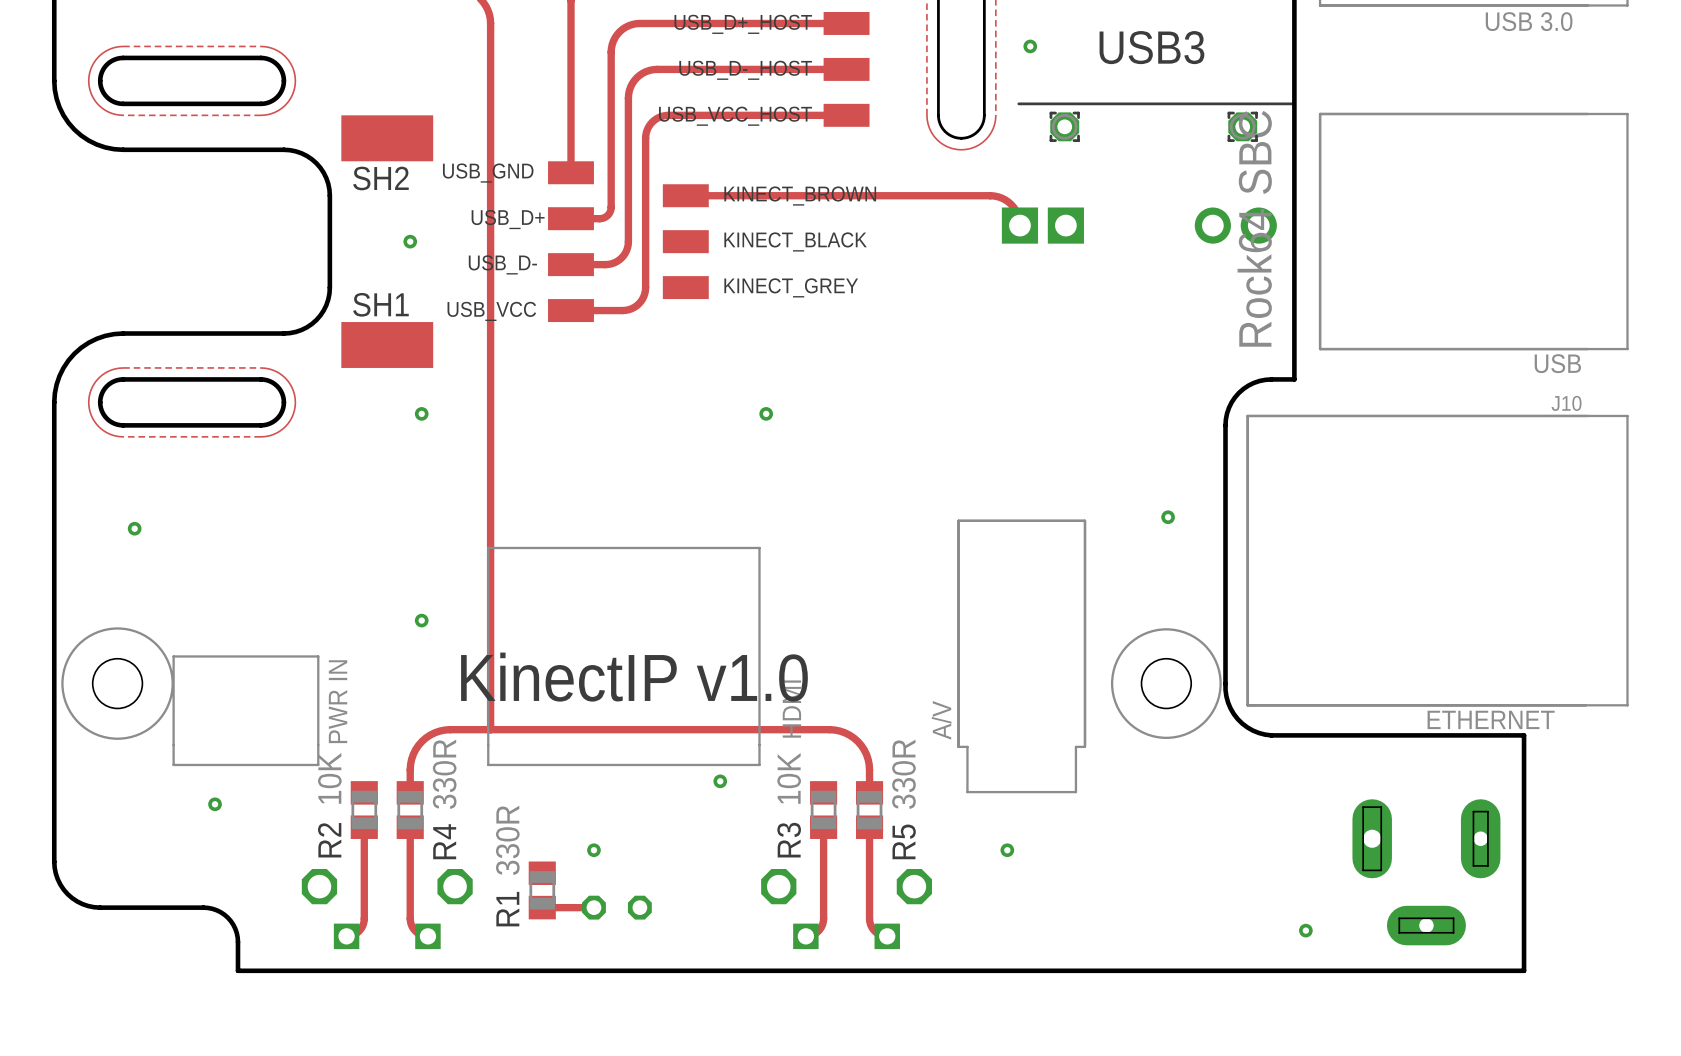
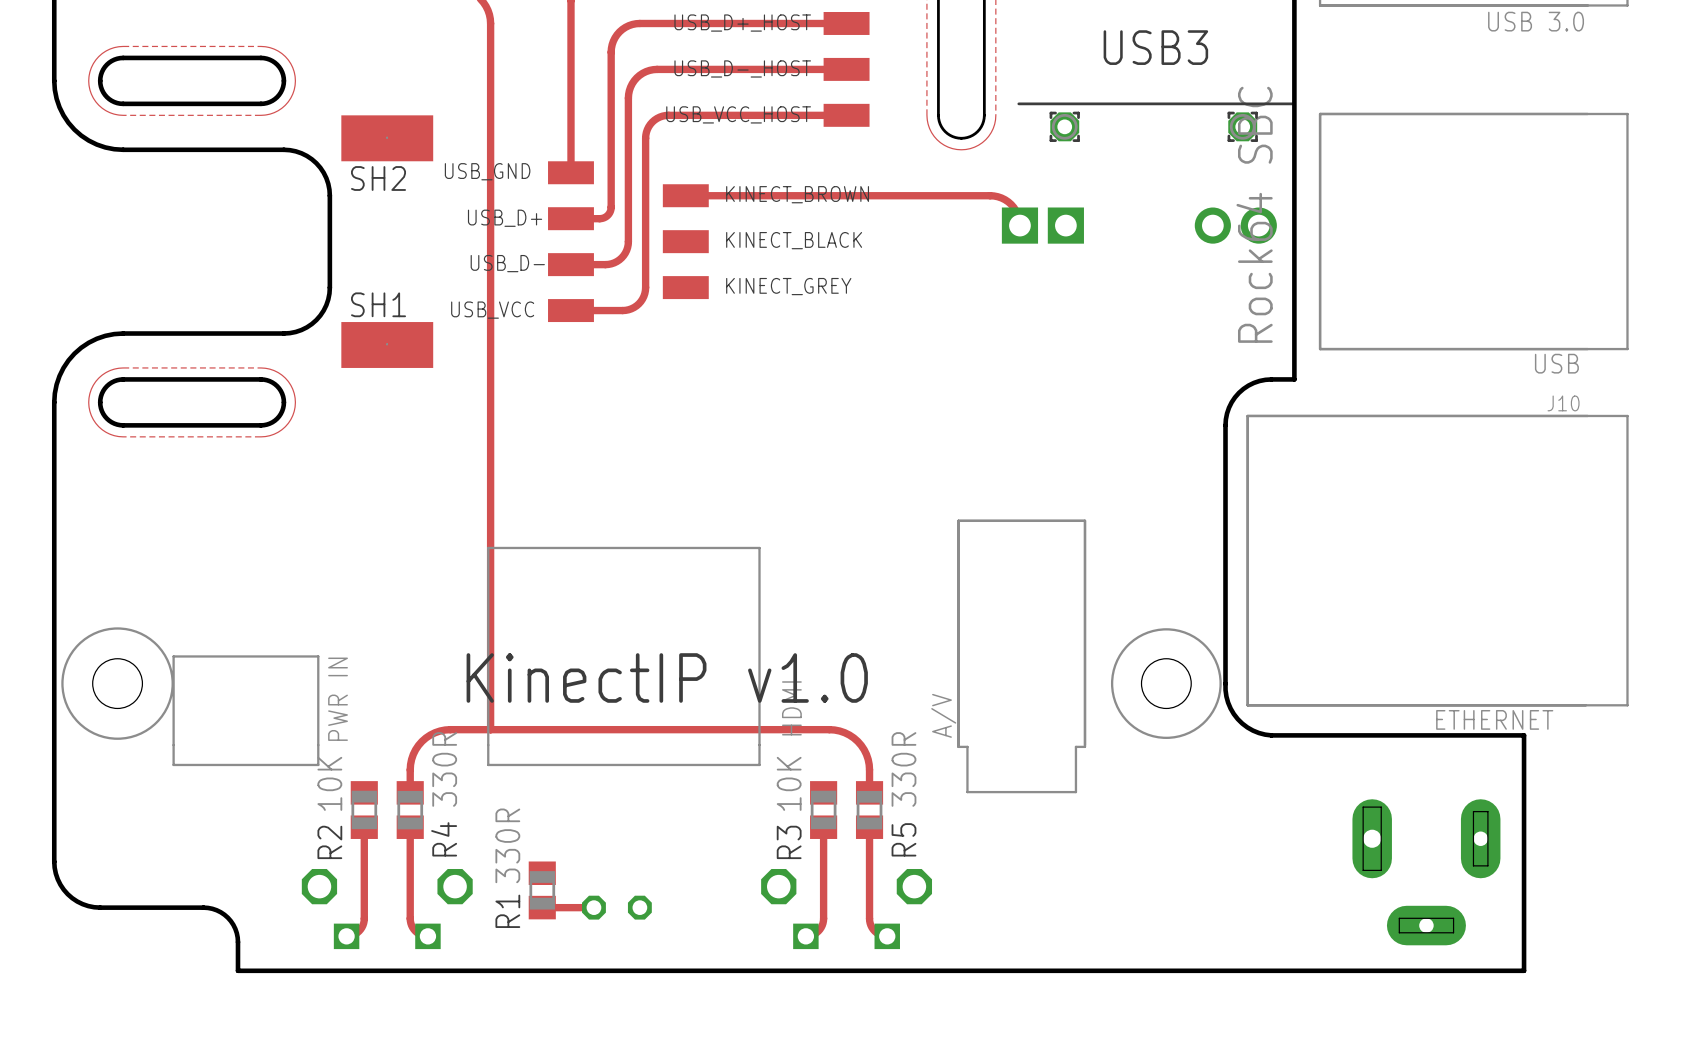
via: (1030, 46) -> none
via: (410, 241) -> none
via: (421, 413) -> none
via: (766, 413) -> none
via: (1168, 517) -> none
via: (134, 528) -> none
via: (421, 620) -> none
via: (720, 781) -> none
via: (215, 804) -> none
via: (593, 850) -> none
via: (1007, 850) -> none
via: (1305, 930) -> none

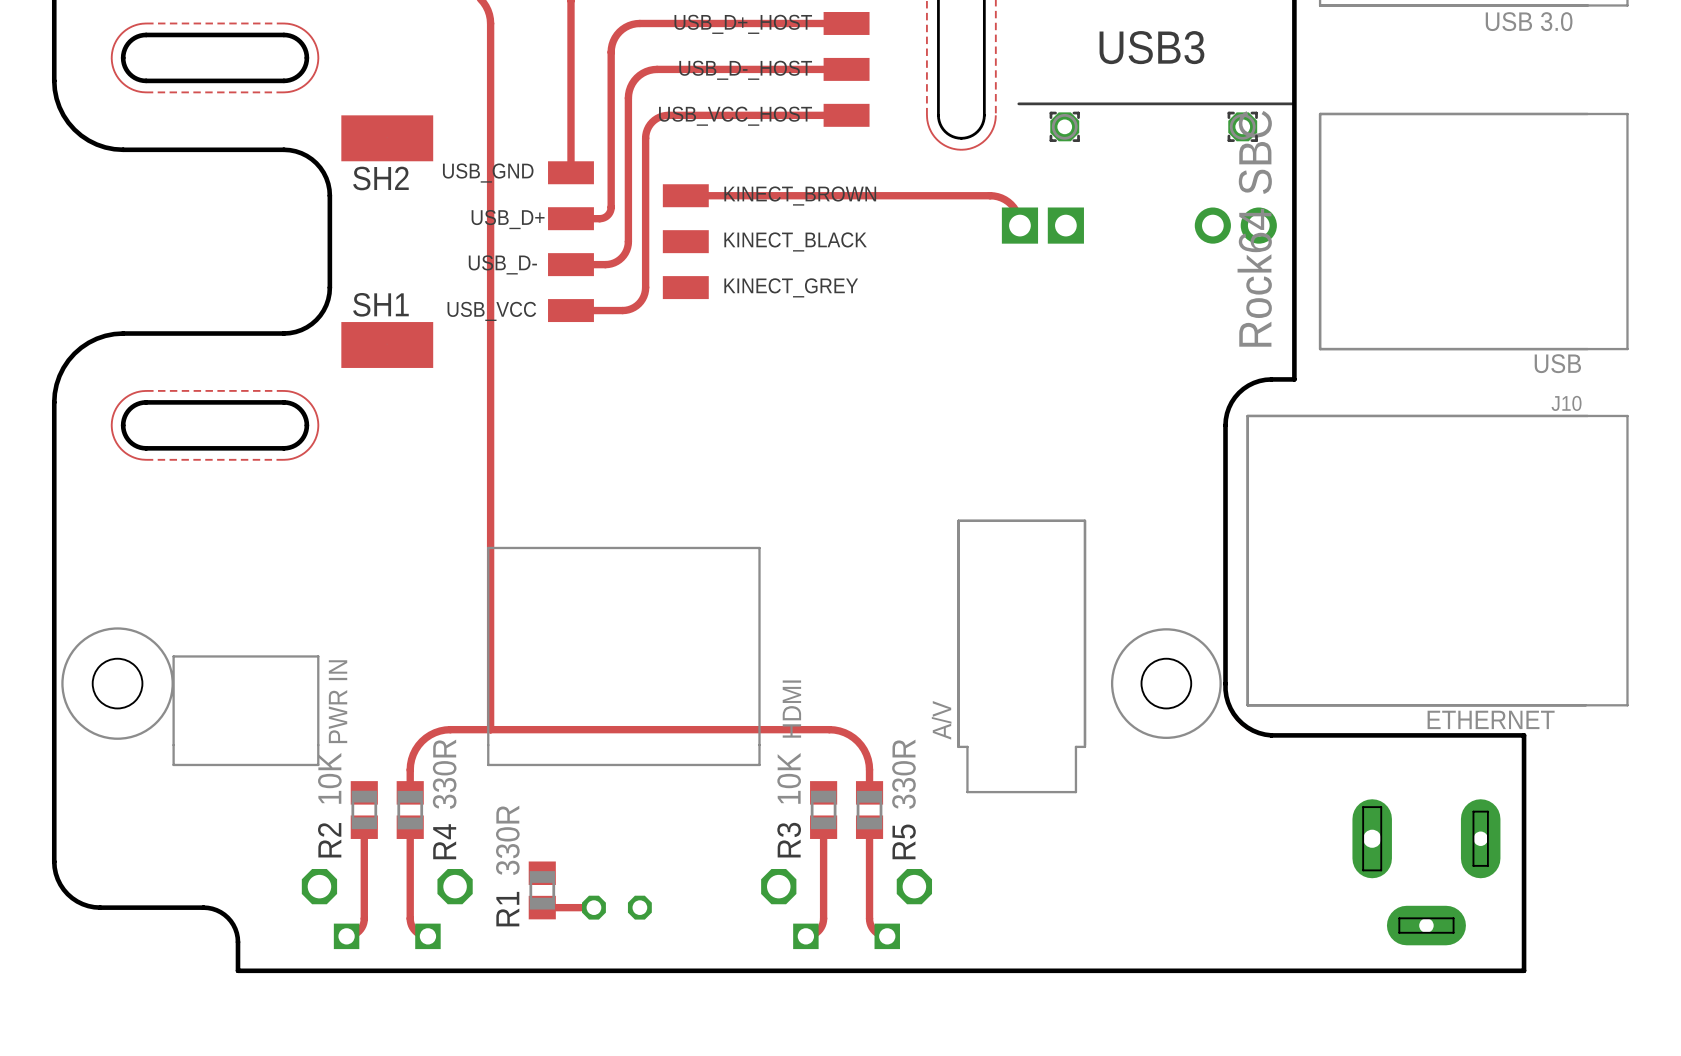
zone outline: (123, 46) (269, 47) (281, 53) (290, 63) (295, 76) (294, 89) (285, 105) (278, 110) (265, 115) (114, 114) (102, 108) (95, 101) (89, 89) (89, 76) (91, 67) (98, 56) (109, 49) (123, 46) -> (146, 23) (292, 24) (304, 30) (313, 40) (318, 53) (317, 66) (308, 82) (297, 89) (288, 92) (137, 91) (128, 87) (118, 78) (112, 66) (111, 53) (116, 40) (121, 33) (132, 26) (146, 23)
board edge: (123, 57) (263, 58) (272, 61) (279, 66) (283, 74) (283, 83) (277, 97) (263, 103) (120, 103) (111, 100) (104, 94) (100, 80) (101, 72) (106, 64) (114, 59) (123, 57) -> (146, 34) (286, 35) (295, 38) (302, 43) (306, 51) (306, 60) (300, 74) (286, 80) (143, 80) (134, 77) (127, 71) (123, 57) (124, 49) (129, 41) (137, 36) (146, 34)
zone outline: (123, 367) (269, 369) (281, 375) (290, 385) (295, 397) (294, 411) (290, 419) (281, 429) (265, 436) (114, 435) (102, 429) (93, 419) (89, 406) (89, 397) (93, 385) (98, 378) (109, 370) (123, 367) -> (146, 390) (292, 392) (304, 398) (313, 408) (318, 420) (317, 434) (313, 442) (304, 452) (288, 459) (137, 458) (125, 452) (116, 442) (111, 429) (111, 420) (116, 408) (121, 401) (132, 393) (146, 390)
board edge: (123, 379) (263, 379) (272, 382) (279, 388) (283, 396) (283, 405) (277, 418) (263, 425) (120, 425) (111, 422) (104, 416) (100, 402) (101, 393) (106, 386) (114, 381) (123, 379) -> (146, 402) (286, 402) (295, 405) (302, 411) (306, 419) (306, 428) (300, 441) (286, 448) (143, 448) (134, 445) (127, 439) (123, 425) (124, 416) (129, 409) (137, 404) (146, 402)
text: KinectIP v1.0 (667, 677) -> none

